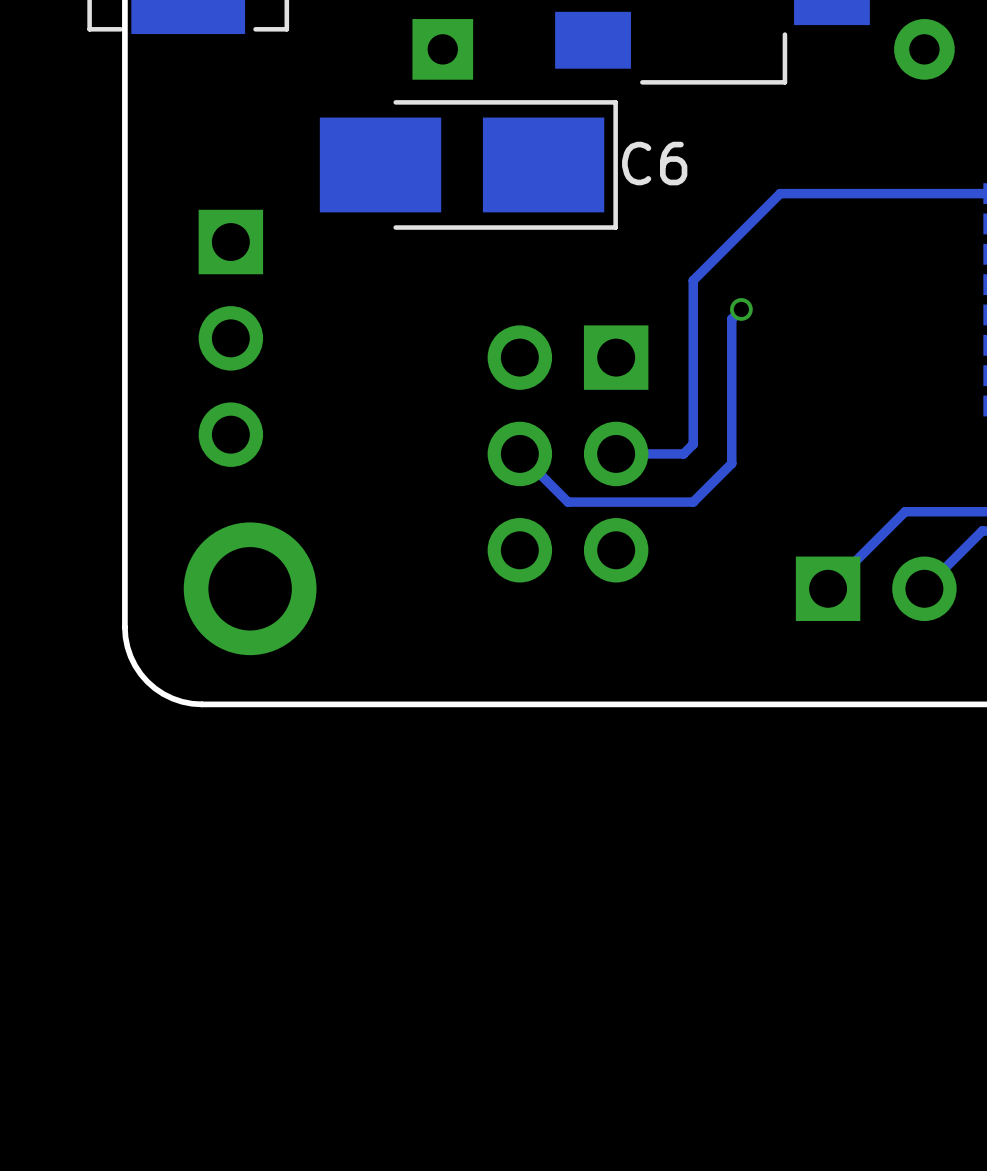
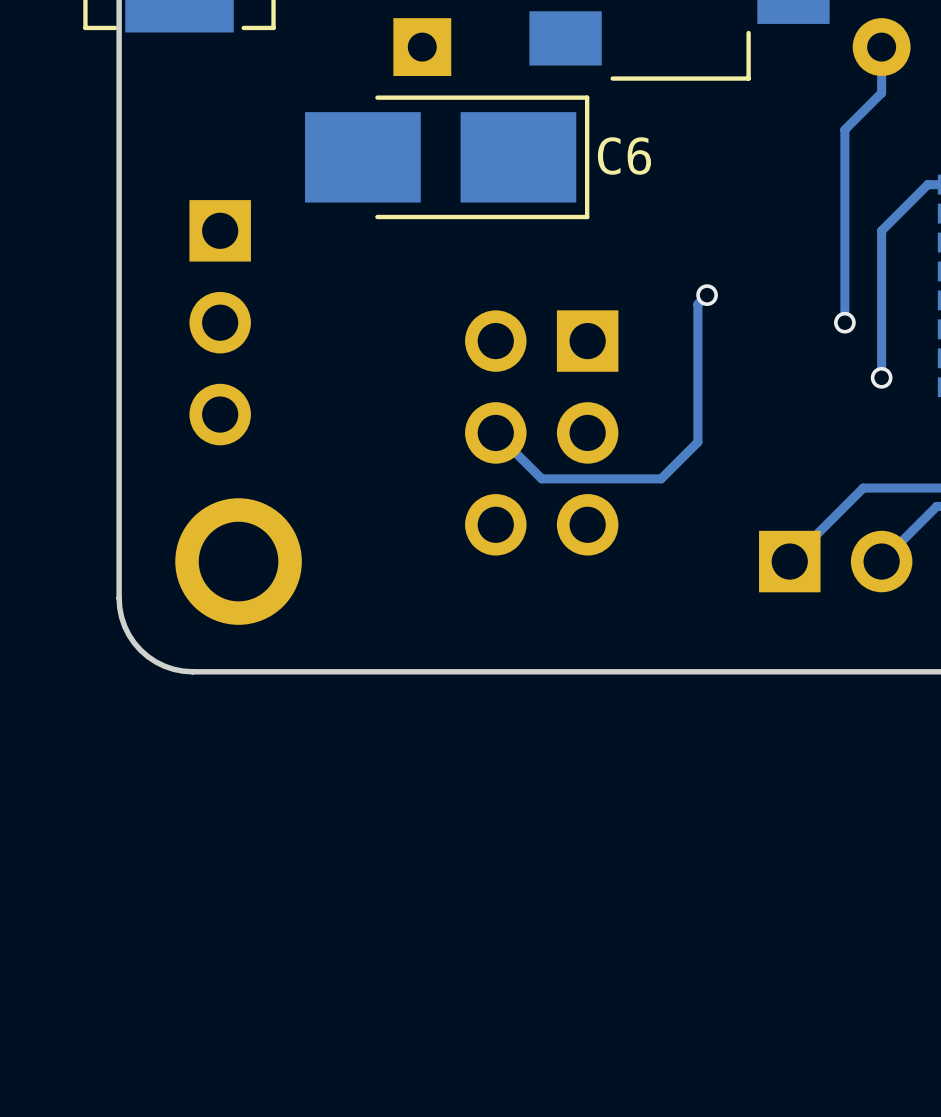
track: none -> (881, 47) (881, 93) (844, 129) (844, 322)
track: (972, 193) (780, 193) (693, 280) (693, 444) (683, 453) (616, 453) -> (927, 184) (881, 230) (881, 377)
via: none -> (844, 322)
via: none -> (881, 377)

